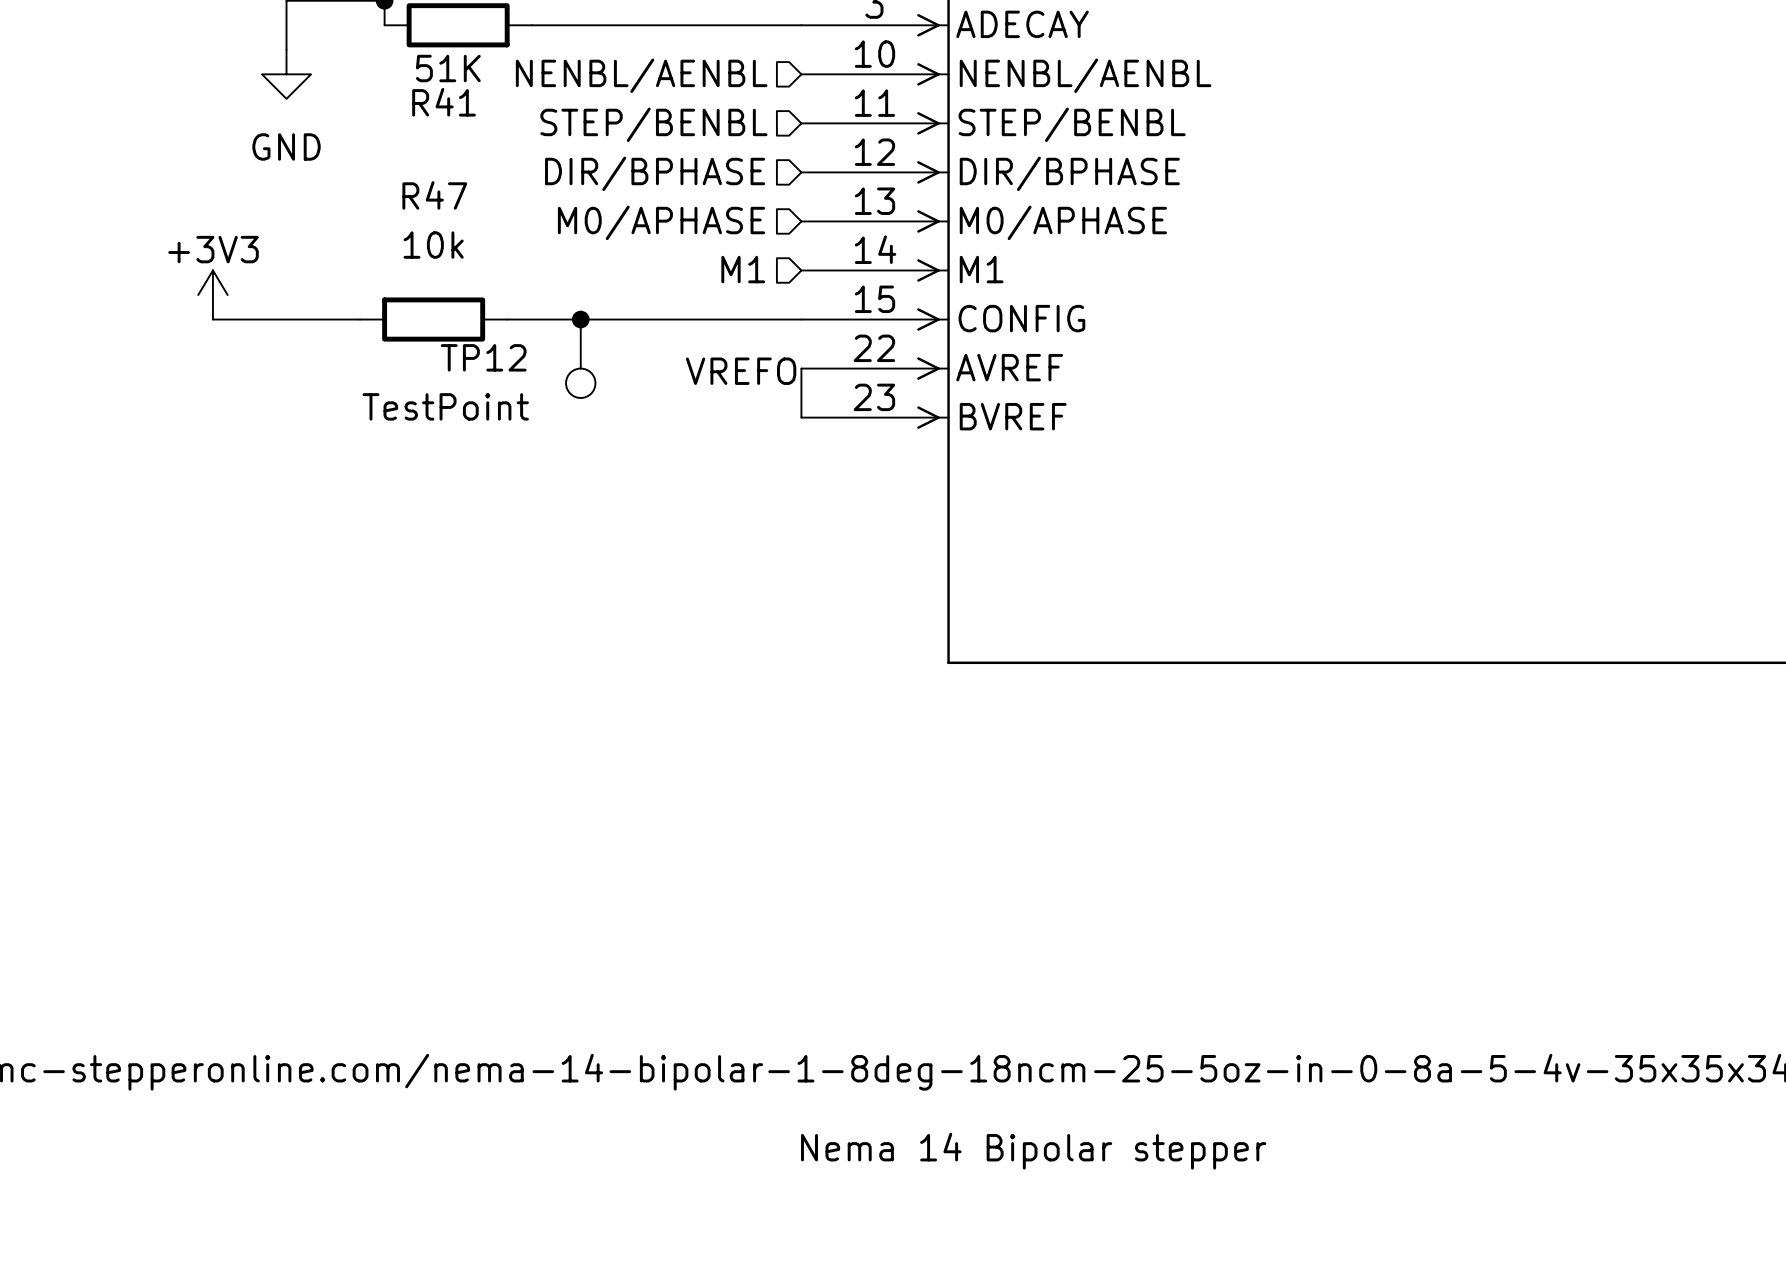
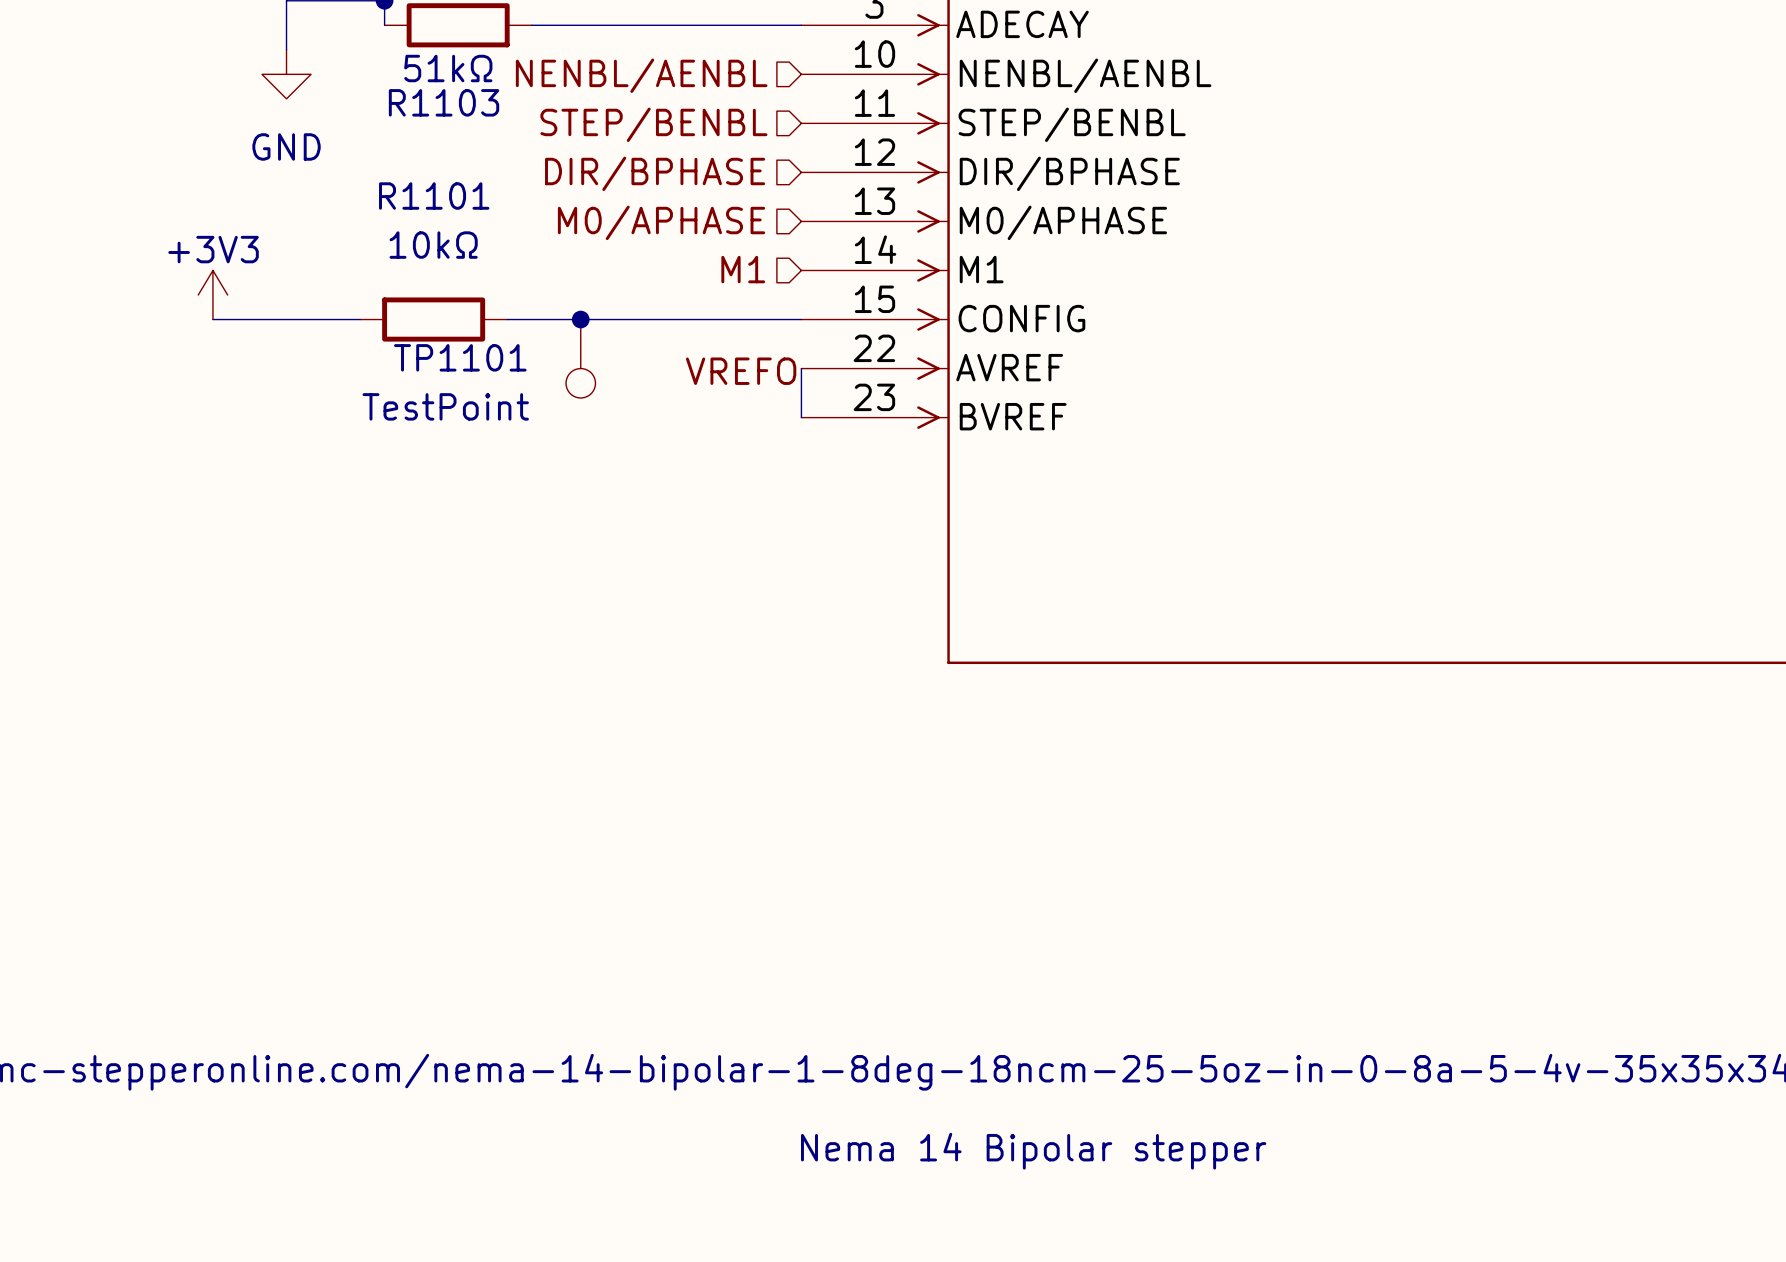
part value: 51K (448, 68) -> 51kΩ (448, 68)
R41 name: R41 (444, 102) -> R1103 (444, 102)
R47 name: R47 (434, 195) -> R1101 (434, 196)
R47 value: 10k (433, 245) -> 10kΩ (433, 245)
TP12 name: TP12 (483, 357) -> TP1101 (460, 357)

